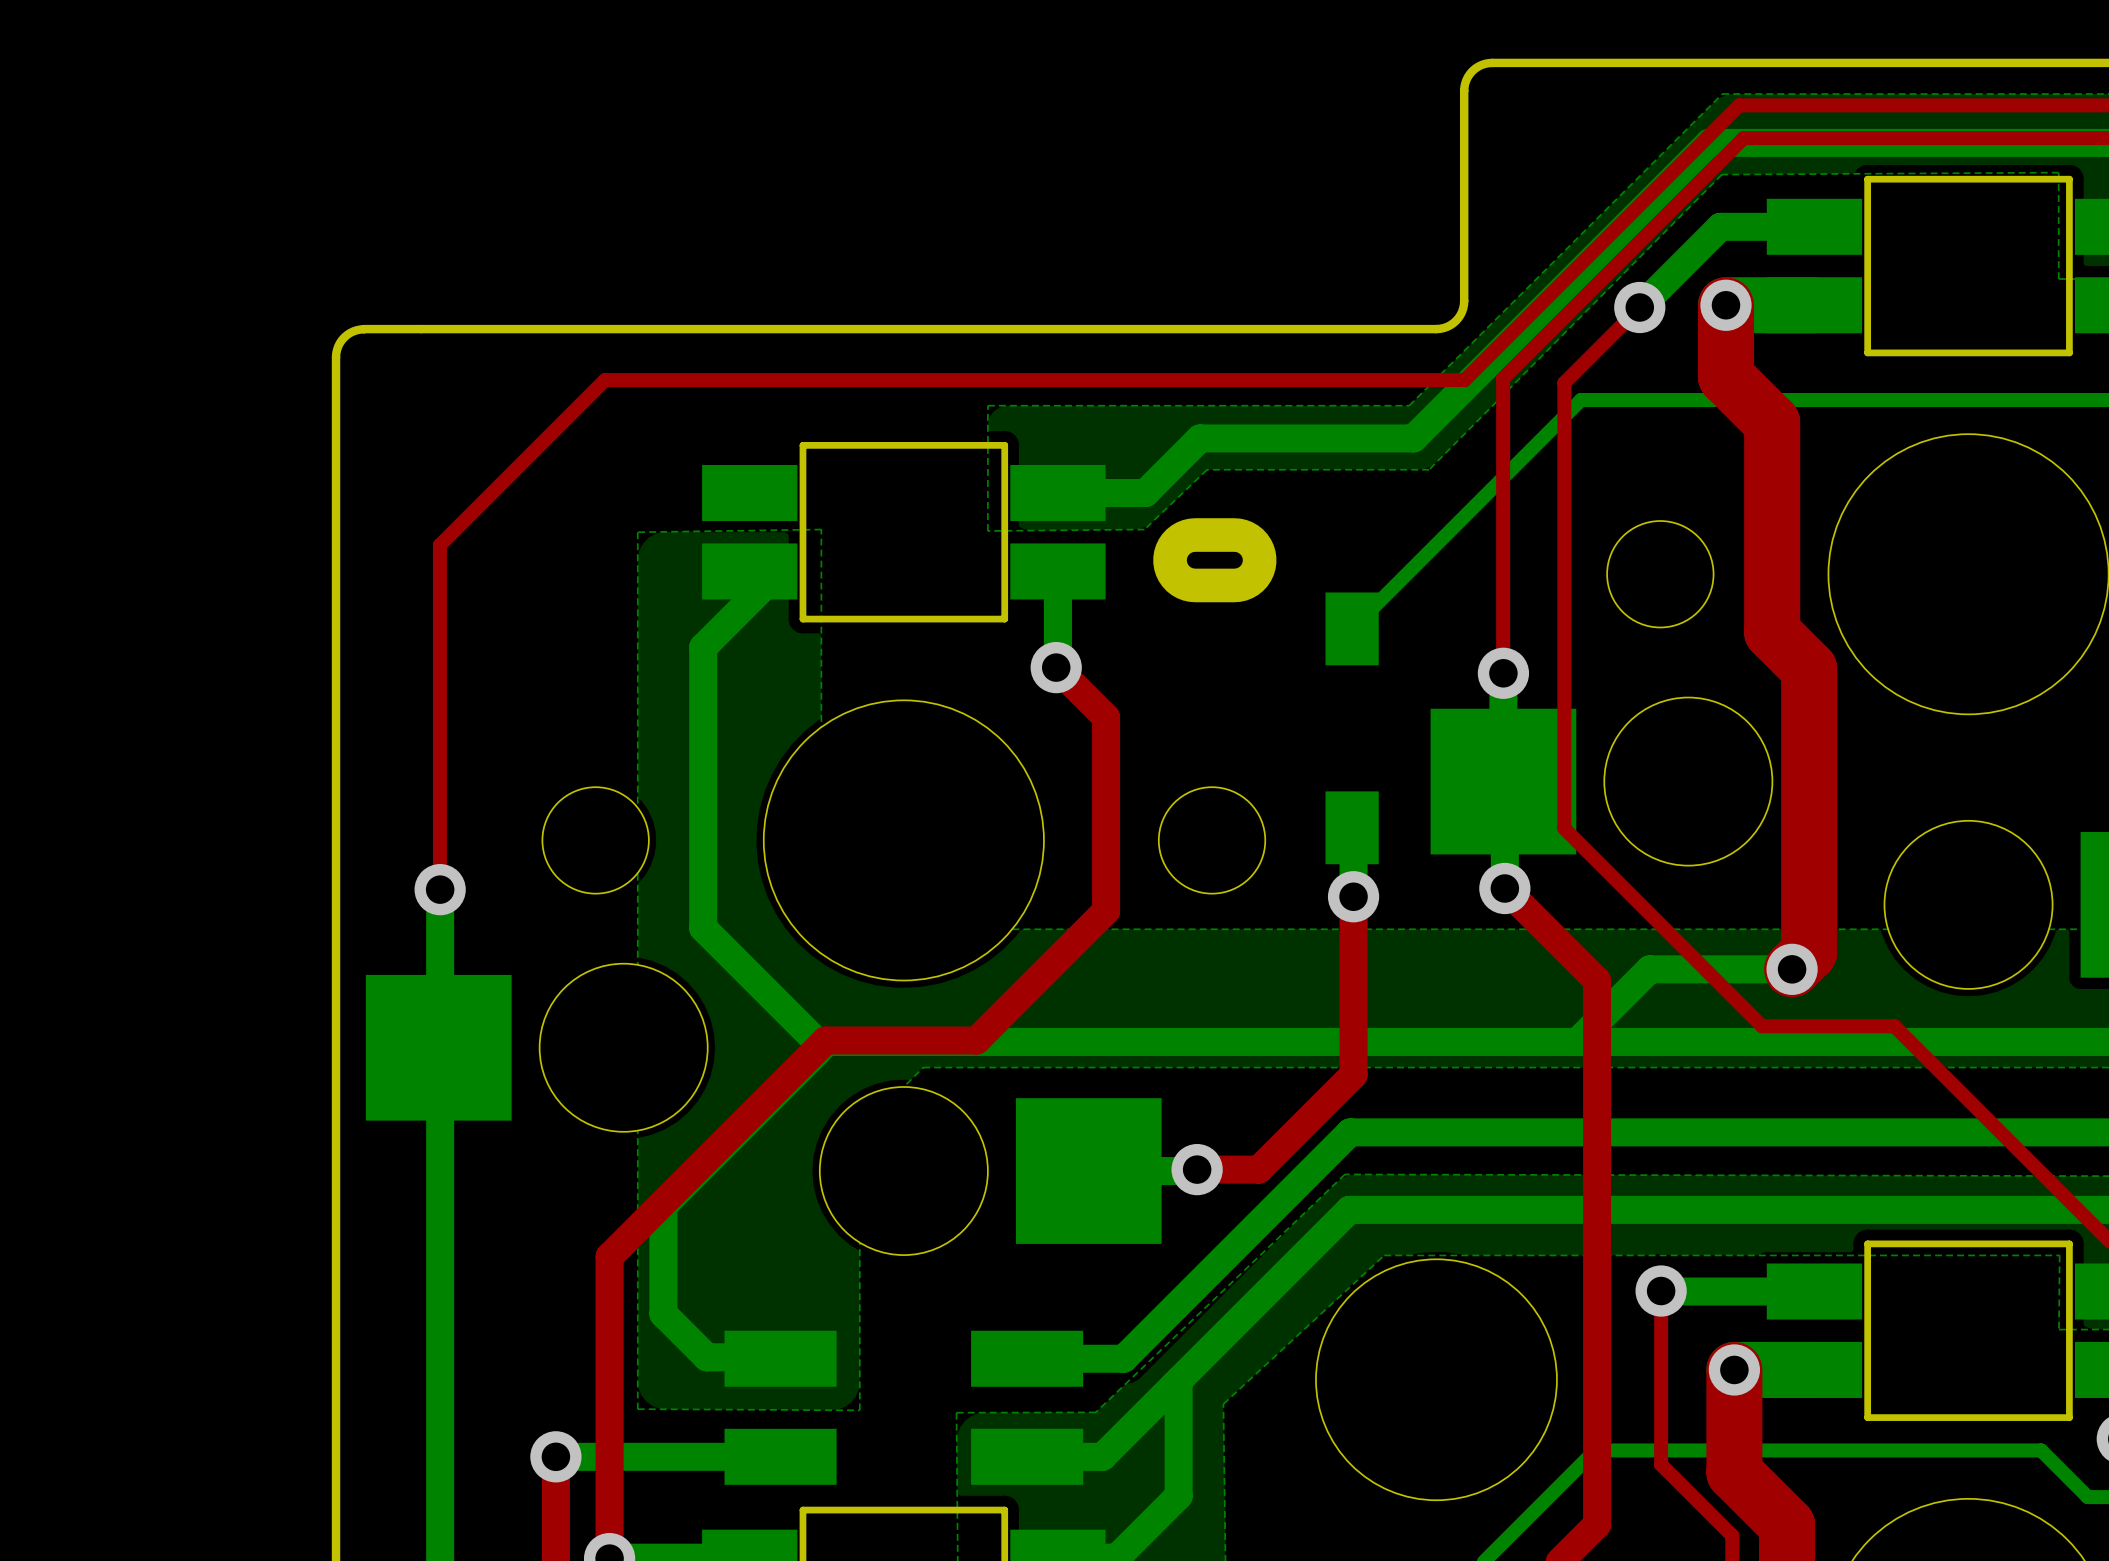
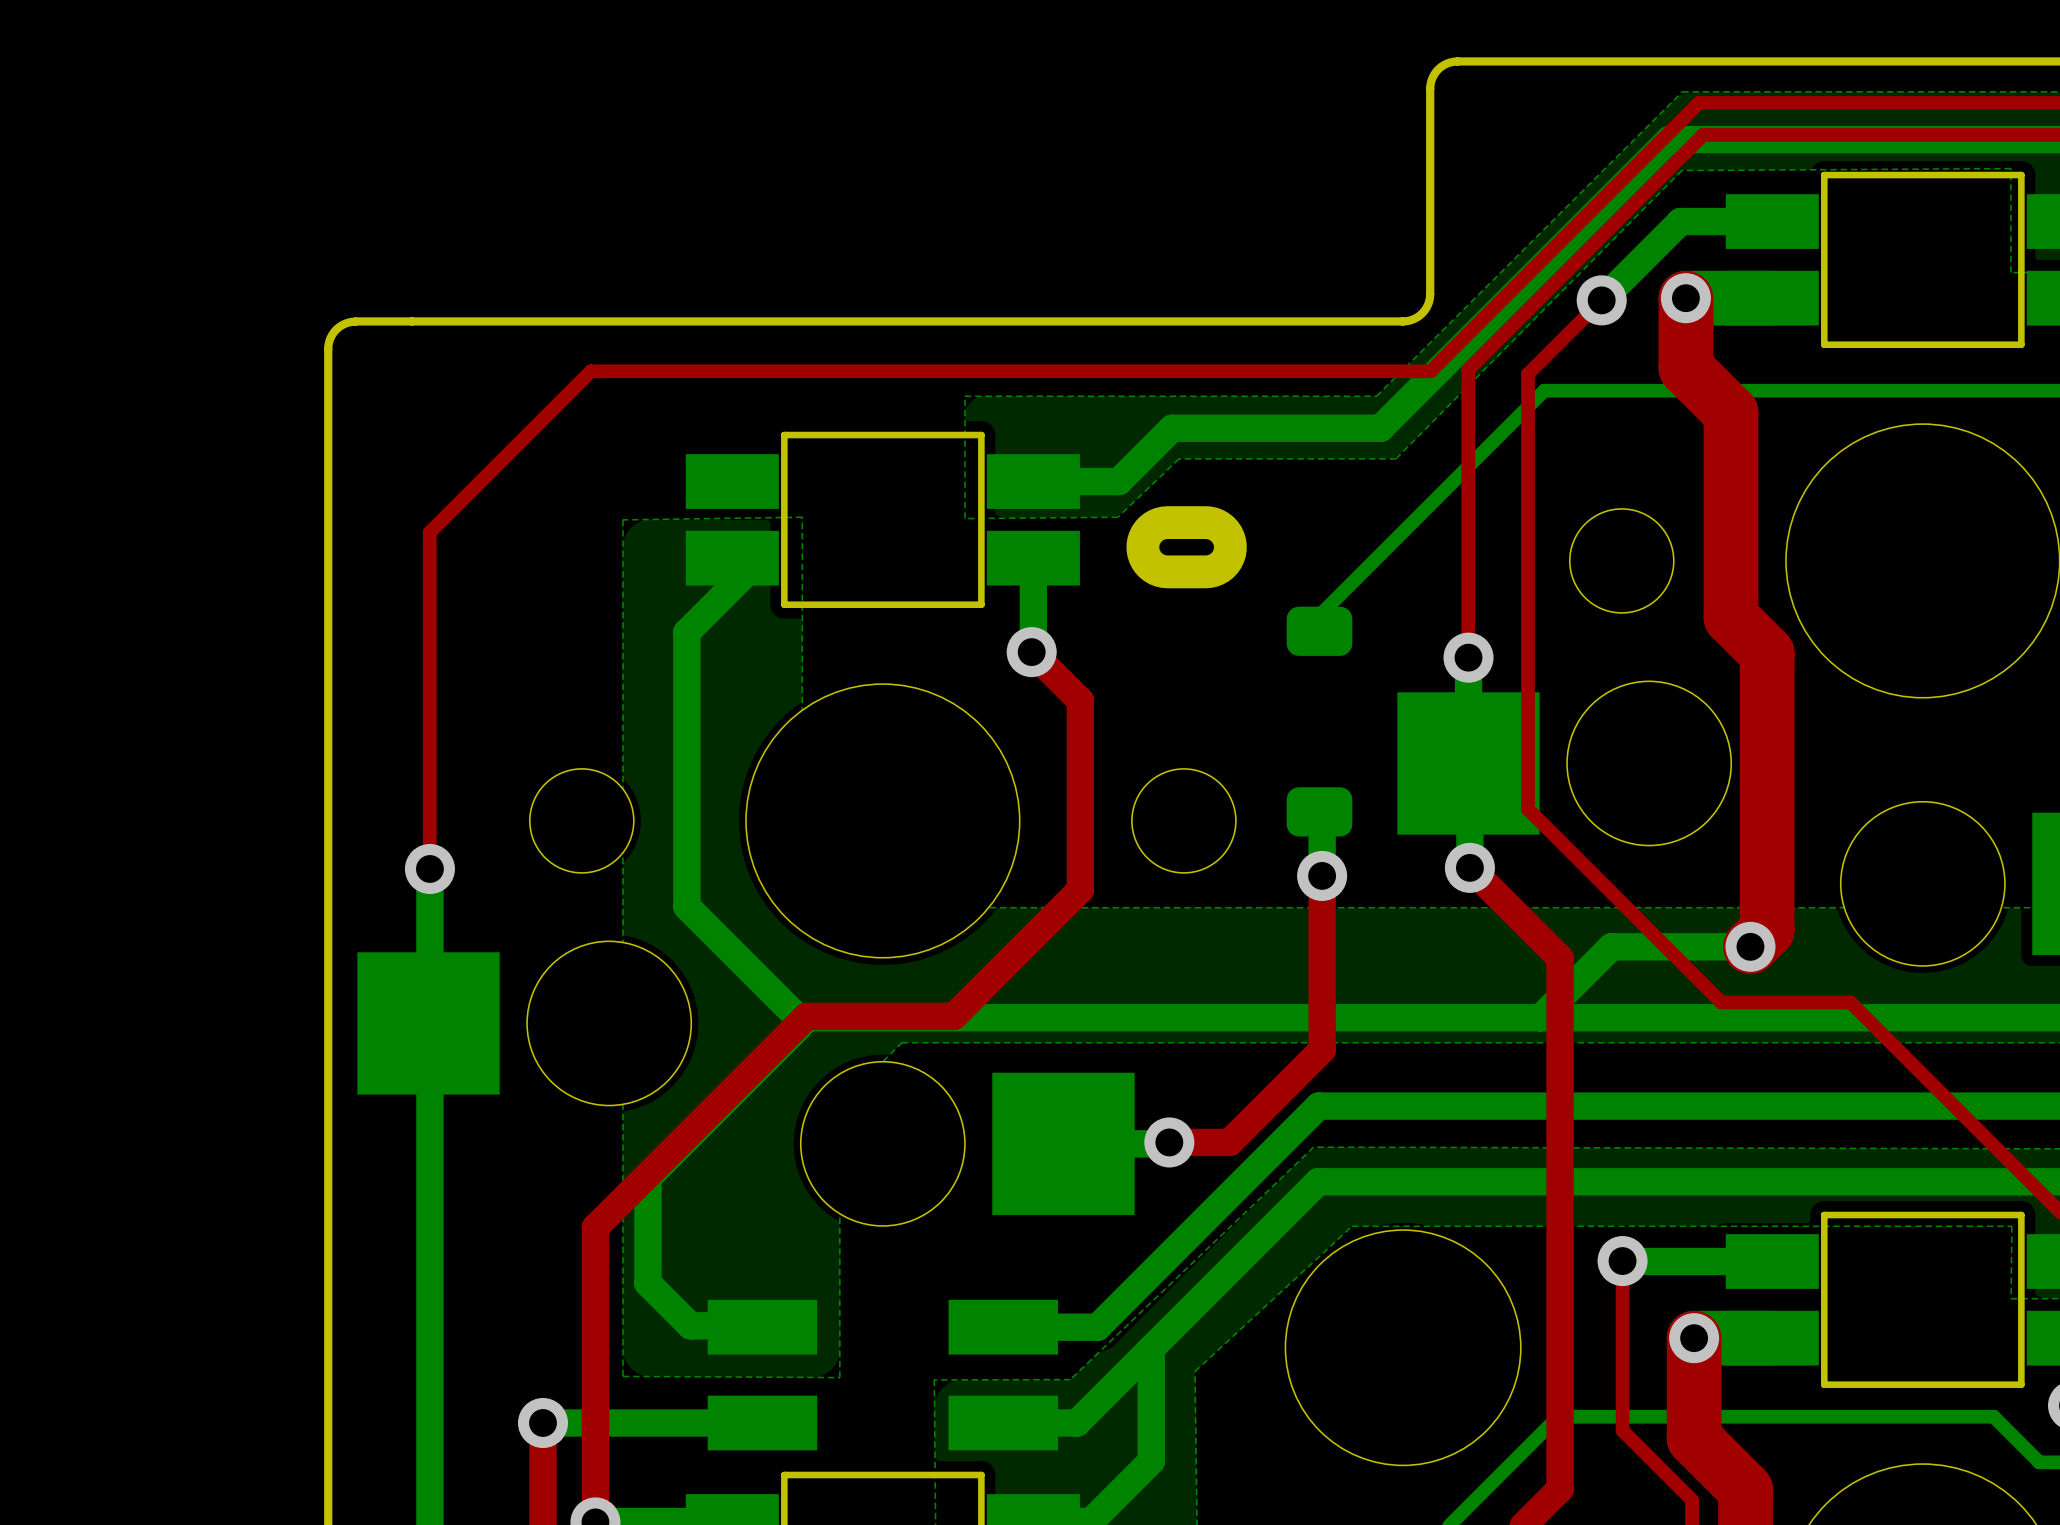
part footprint: [1325, 592, 1379, 865] -> [1286, 606, 1353, 837]

